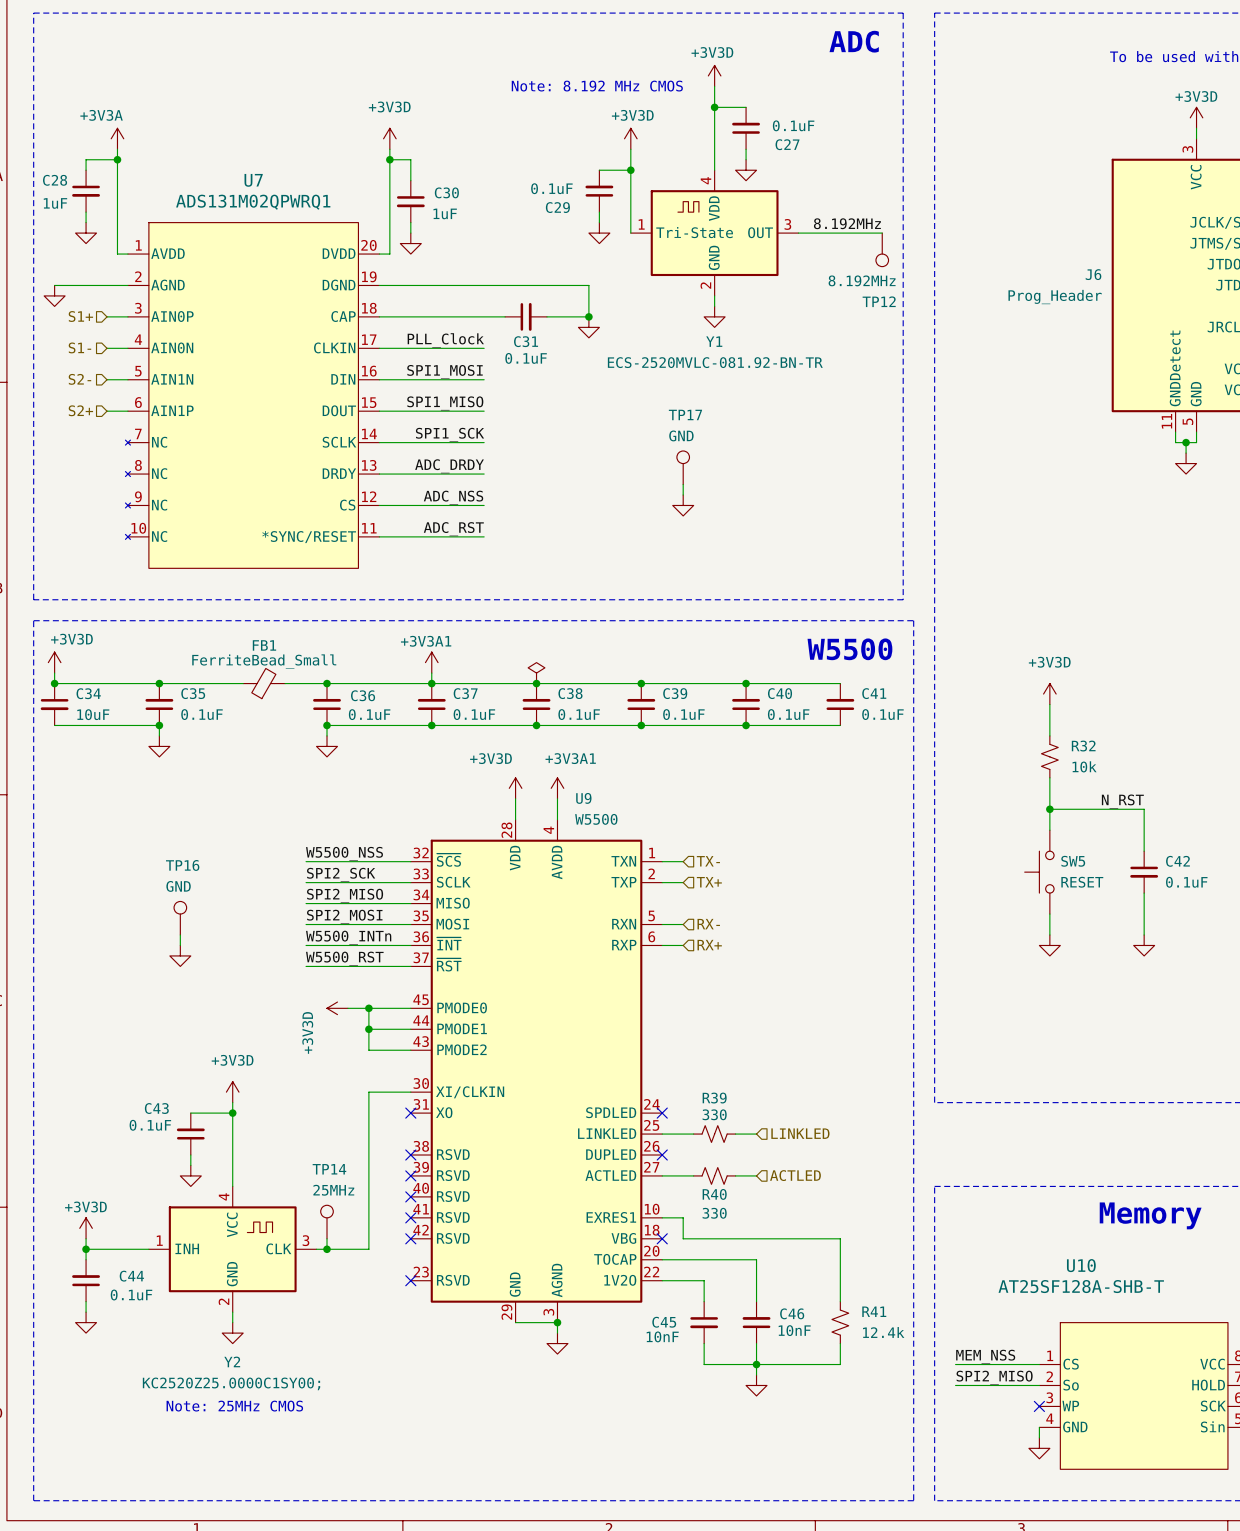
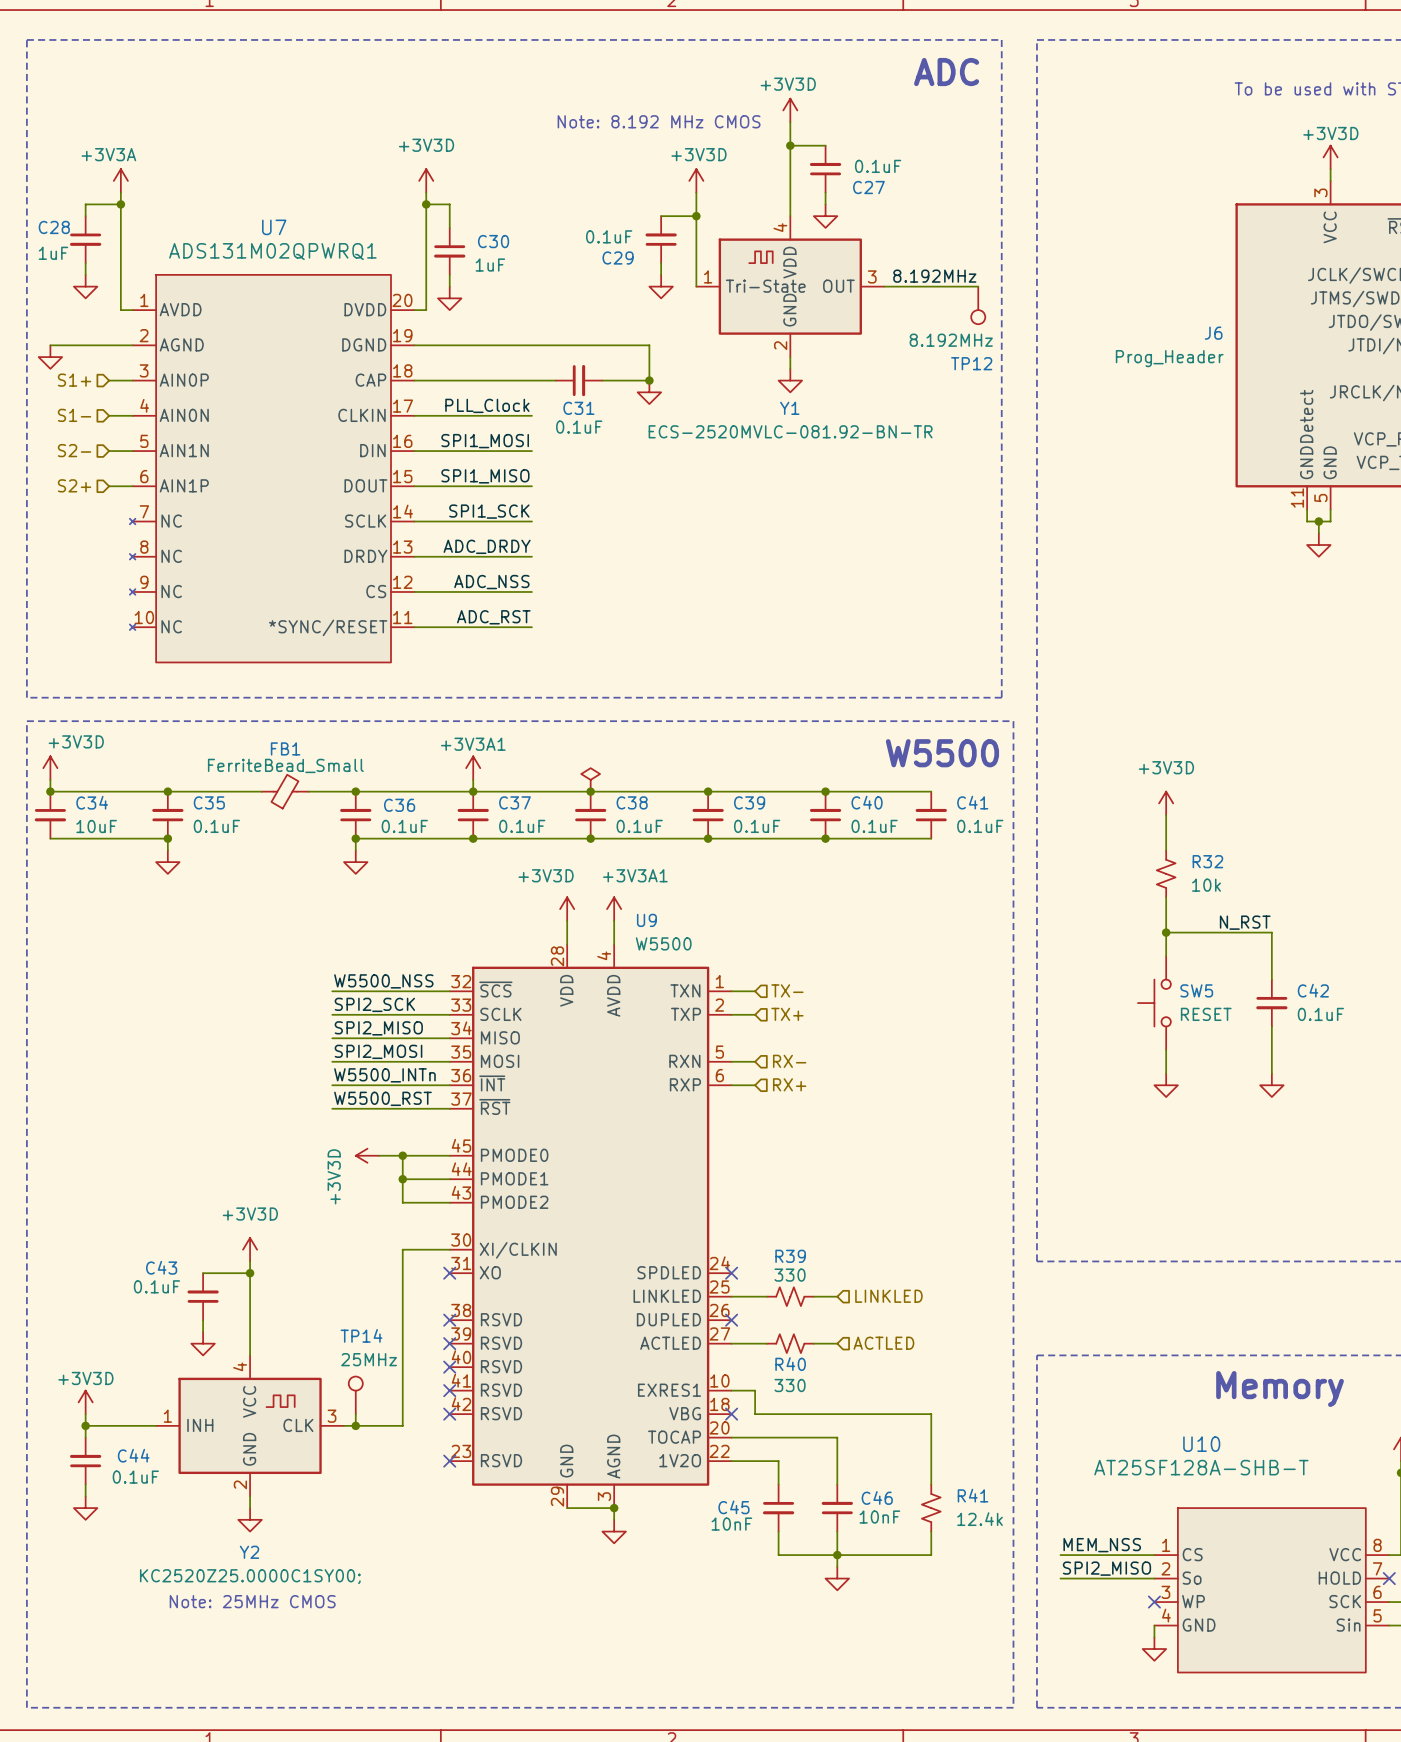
TP17: GND (683, 467) -> none
wire: (683, 484) (683, 494) -> none
power symbol: (683, 505) -> none
TP16: GND (180, 918) -> none
wire: (180, 935) (180, 945) -> none
power symbol: (180, 955) -> none

